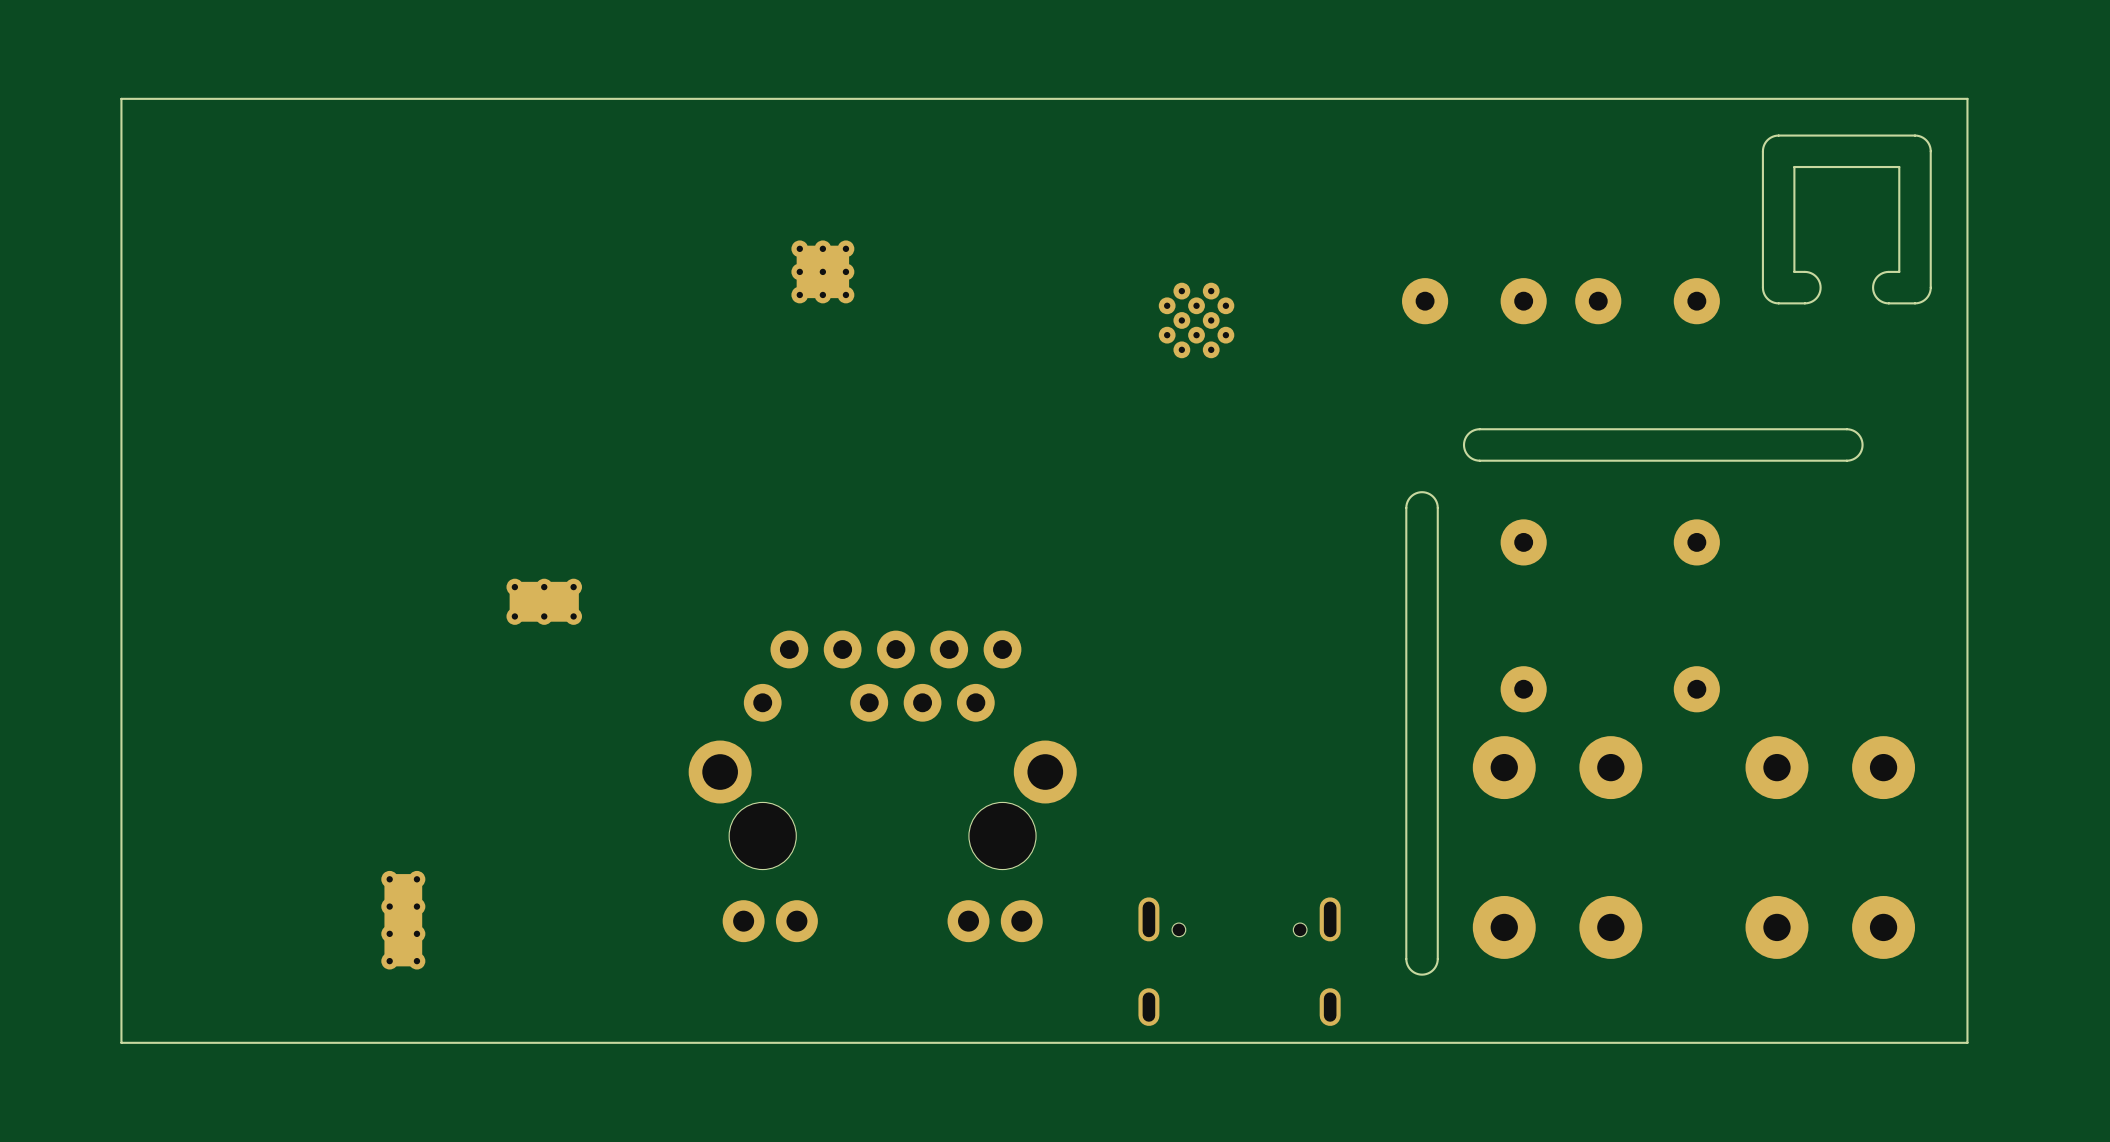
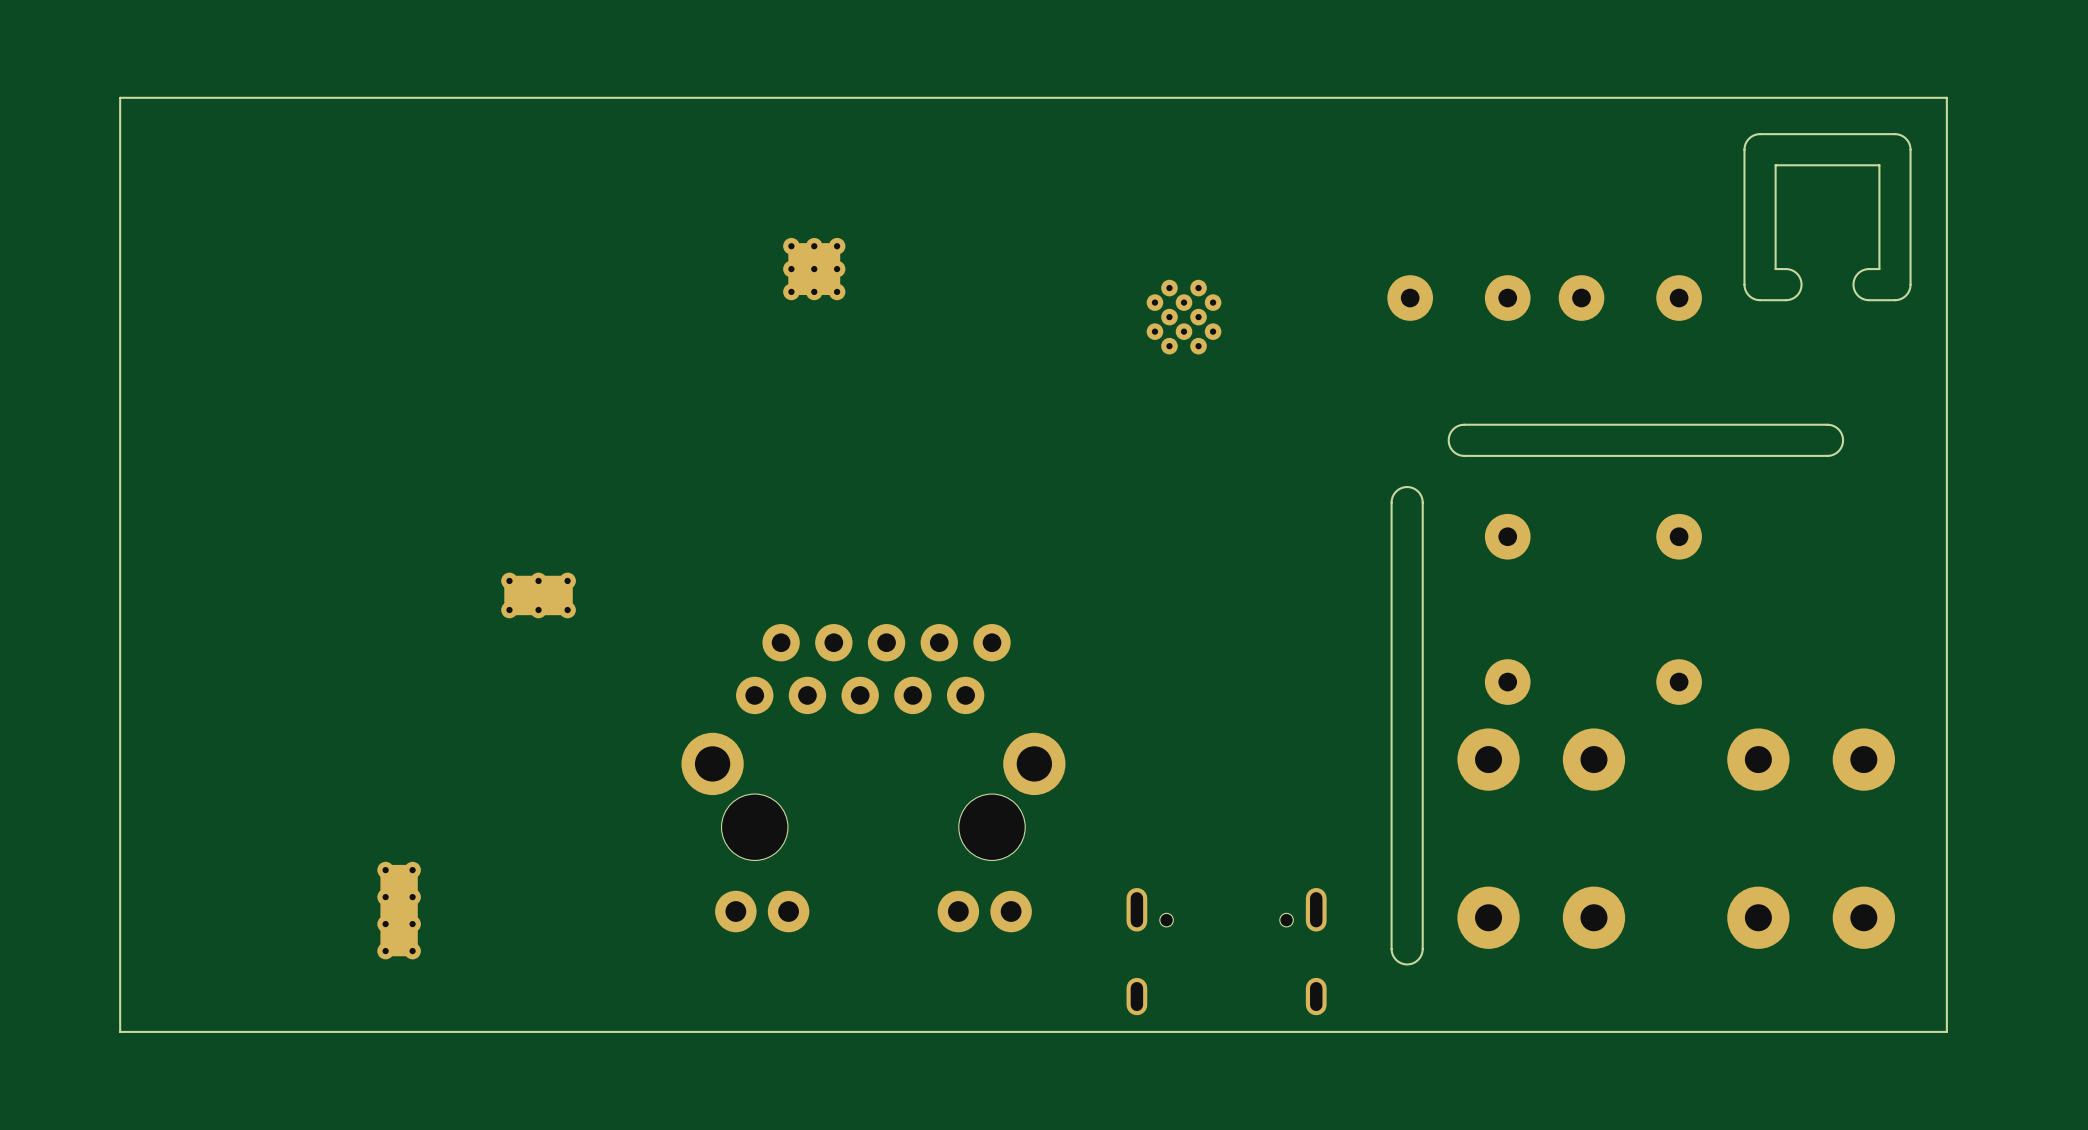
part footprint: [688, 630, 1077, 943] -> [681, 624, 1066, 933]

